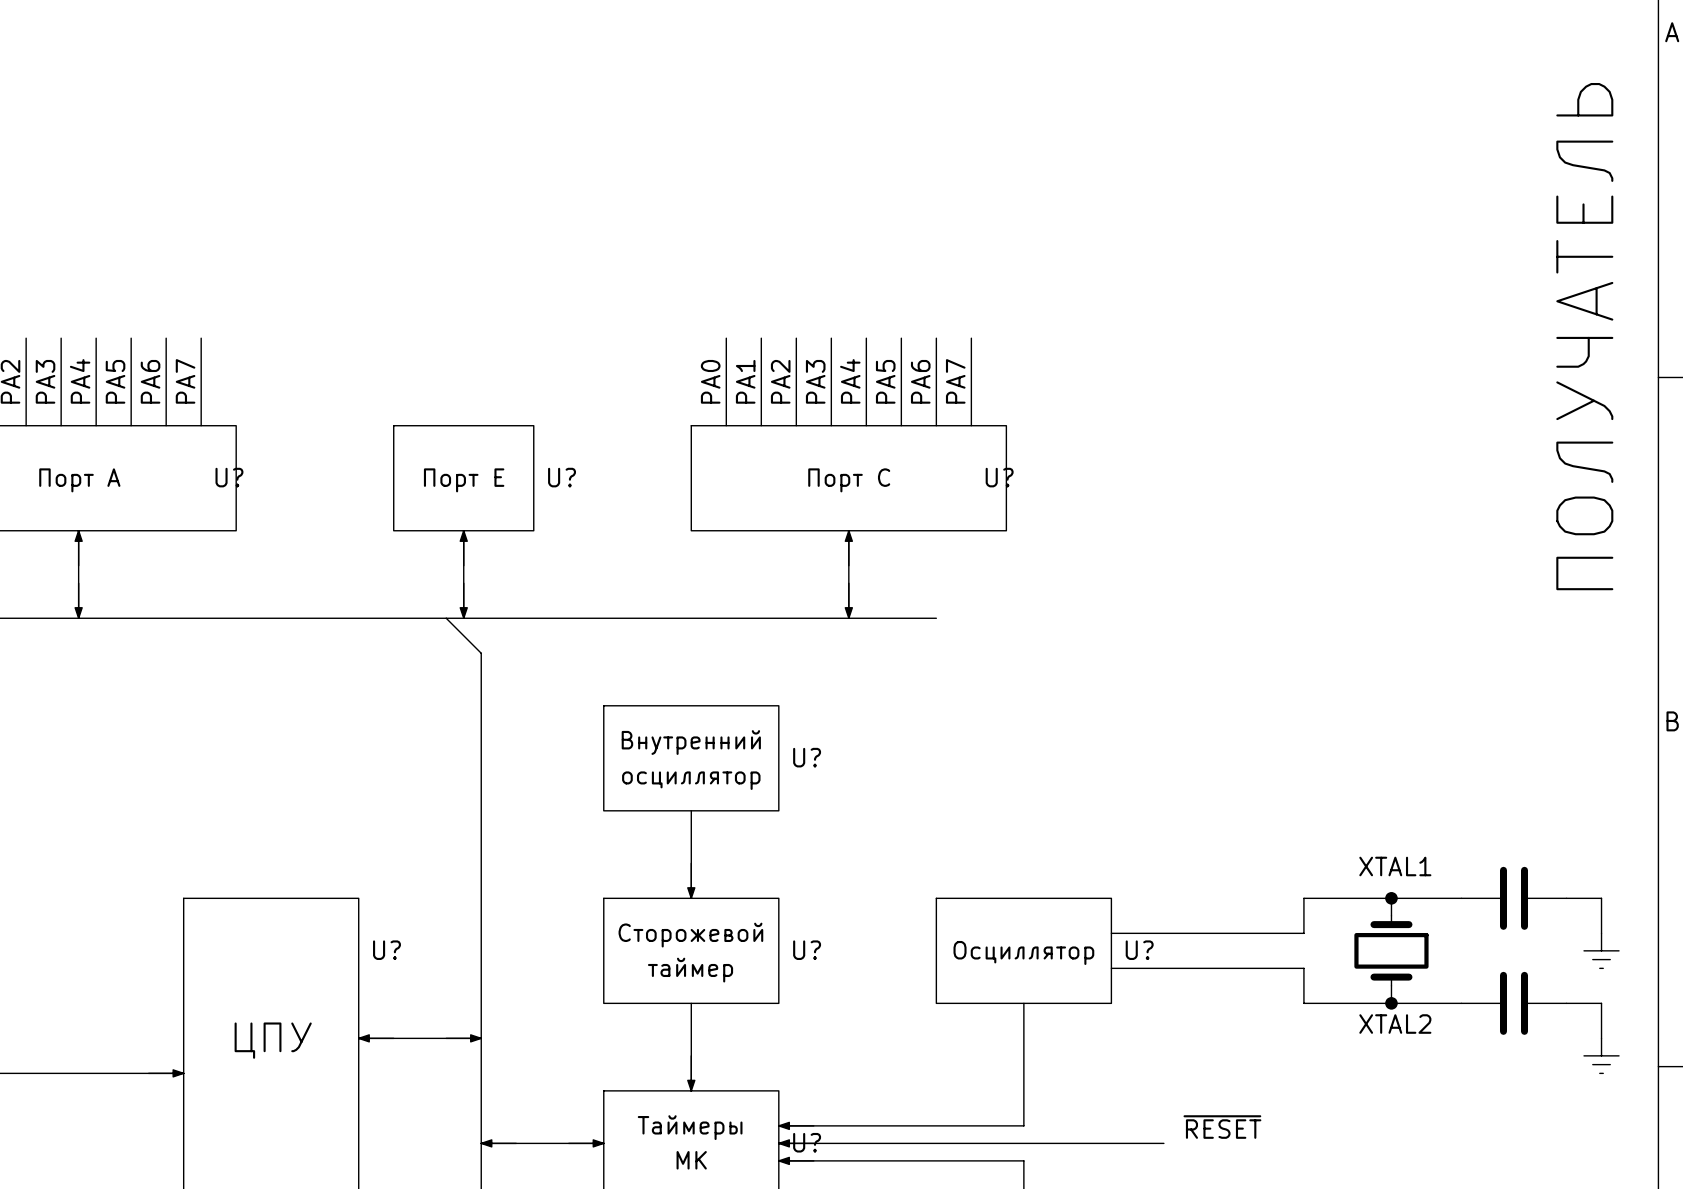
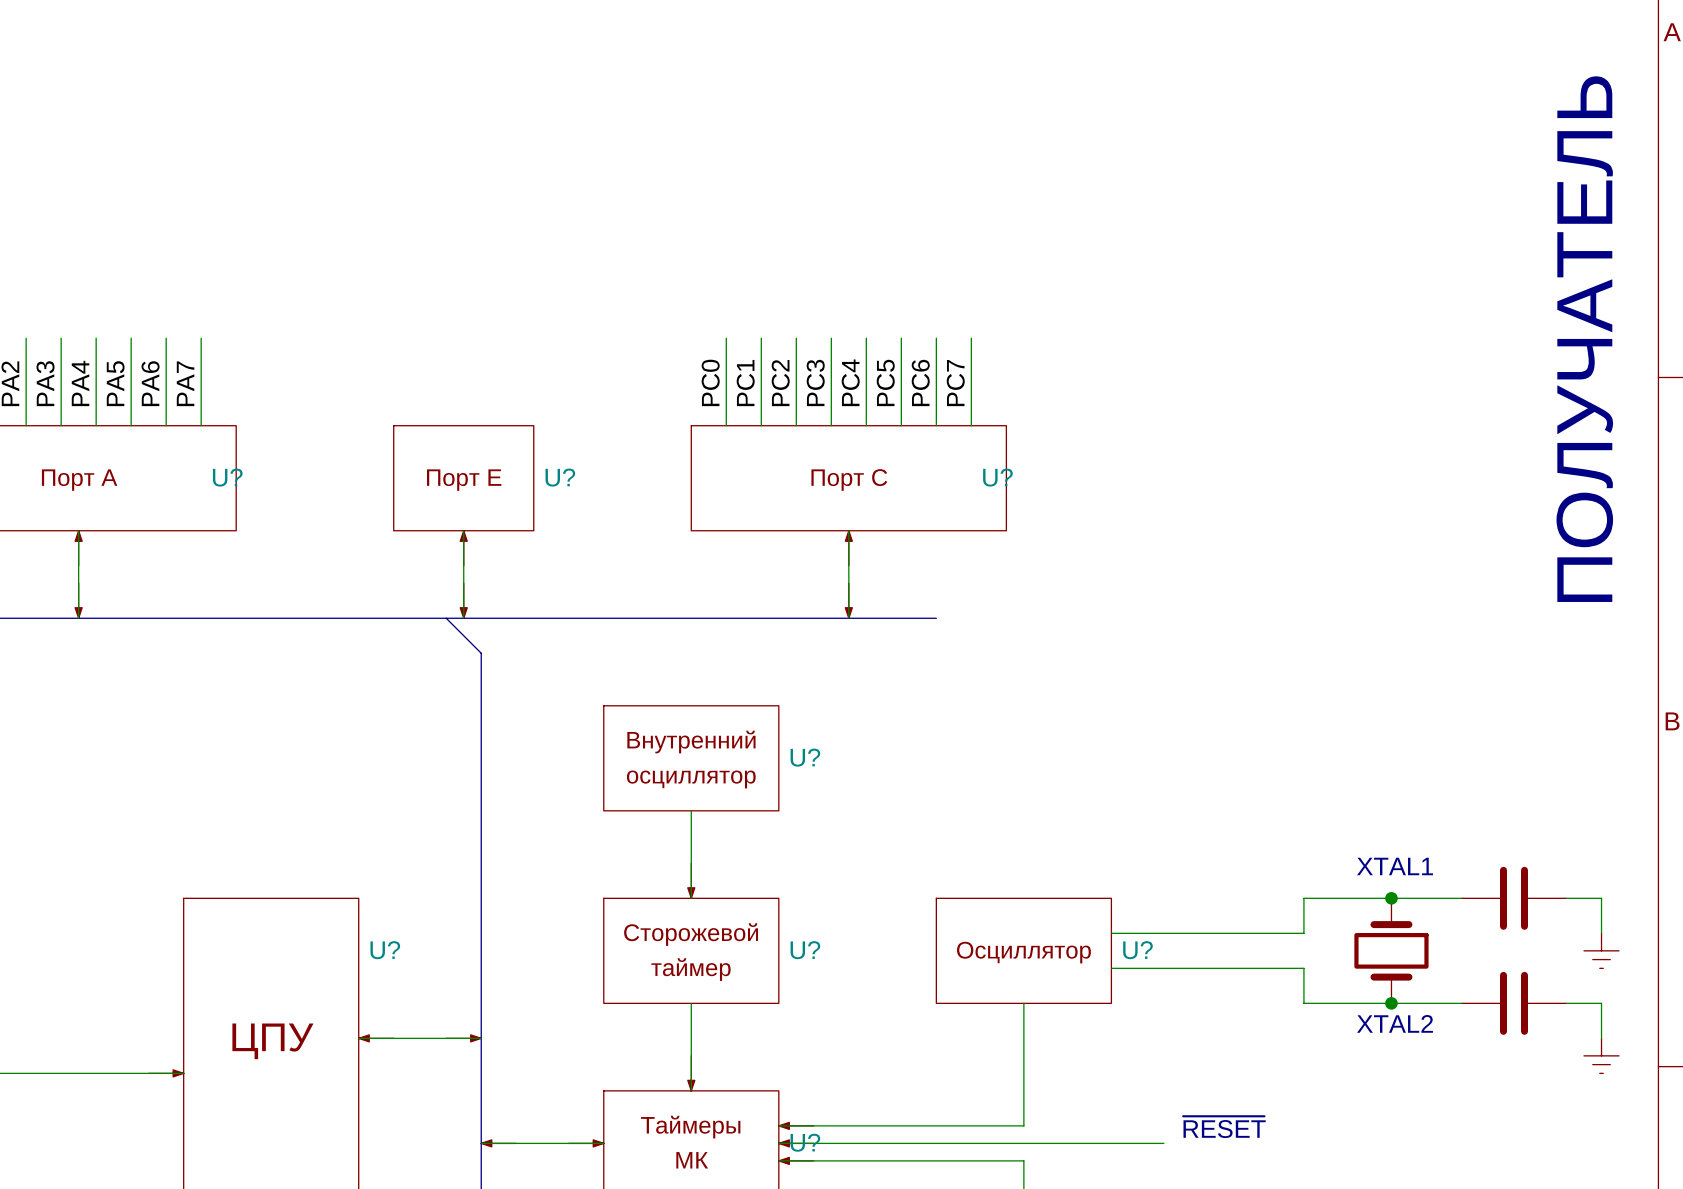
label: PA0 (710, 381) -> PC0 (710, 382)
label: PA1 (745, 381) -> PC1 (745, 383)
label: PA2 (780, 381) -> PC2 (780, 383)
label: PA3 (815, 381) -> PC3 (815, 382)
label: PA4 (850, 381) -> PC4 (850, 382)
label: PA5 (885, 381) -> PC5 (885, 382)
label: PA6 (920, 381) -> PC6 (920, 382)
label: PA7 (955, 381) -> PC7 (955, 383)

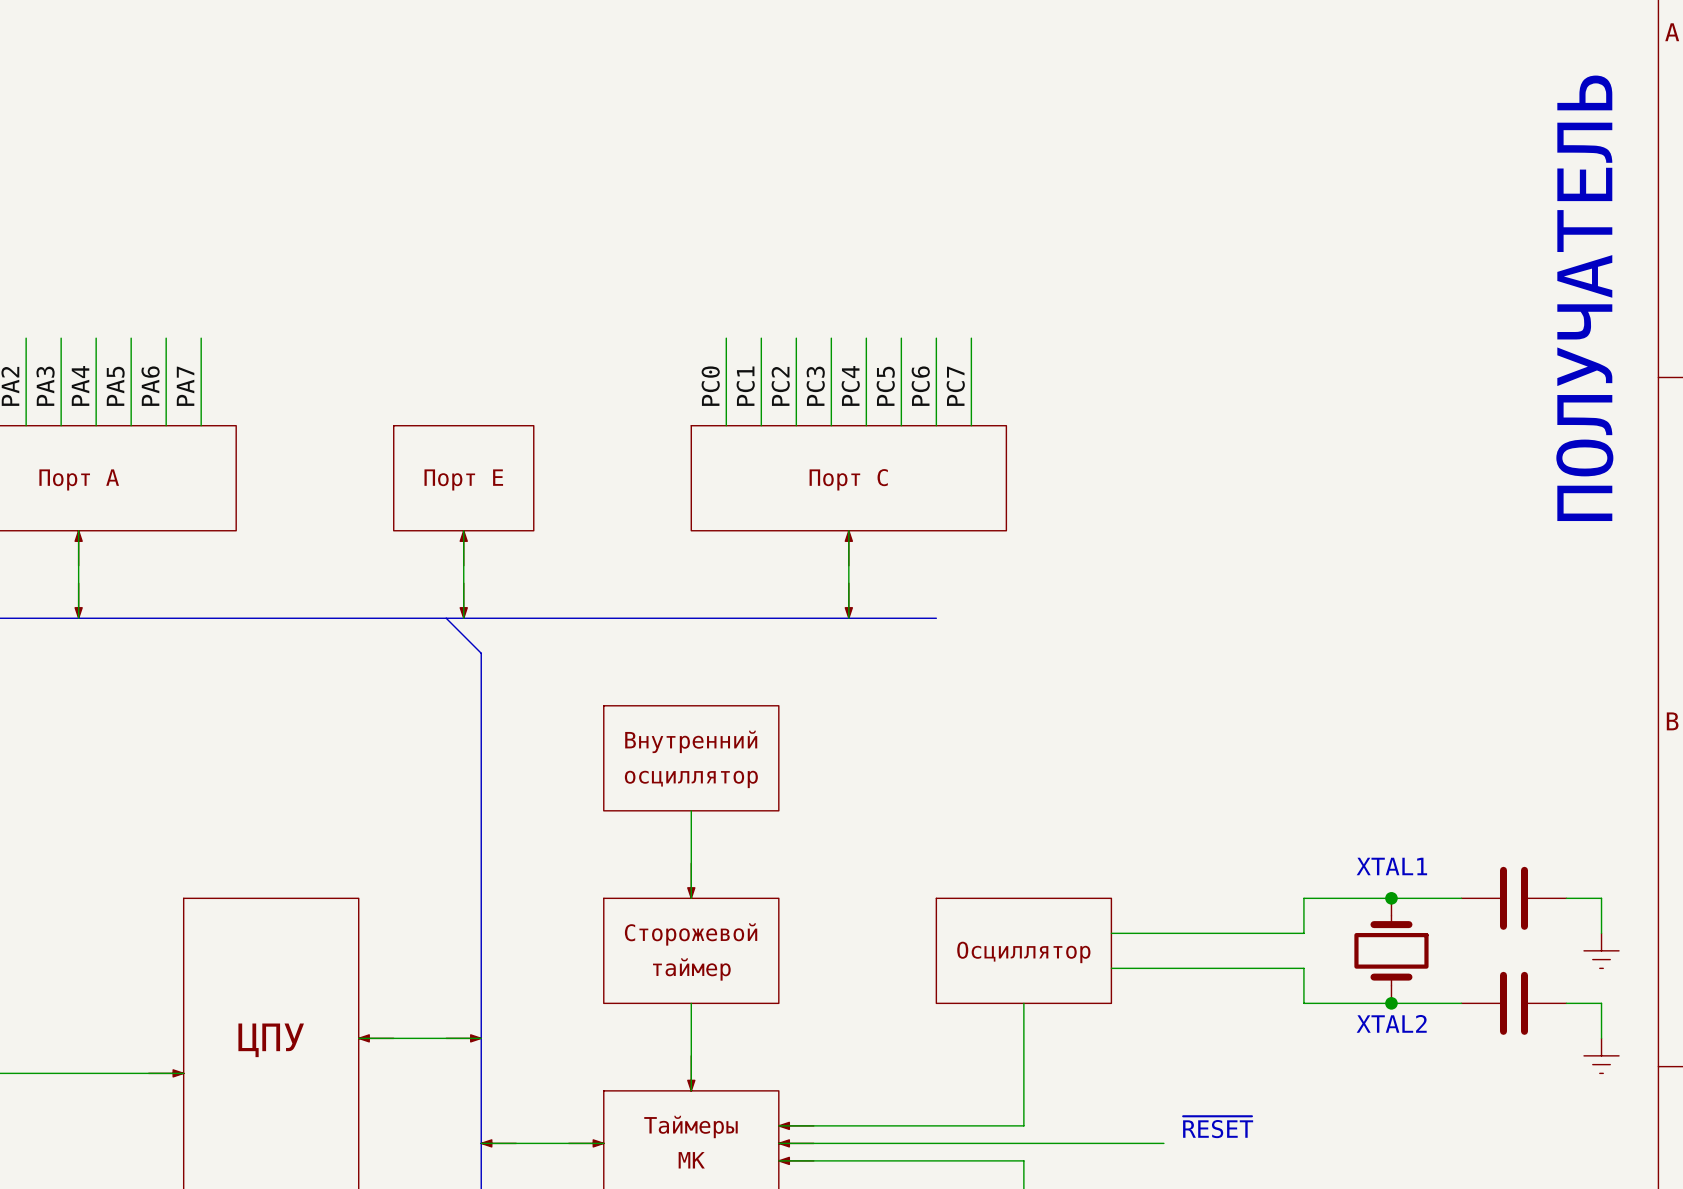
U? name: U? (227, 477) -> none
U? name: U? (560, 477) -> none
U? name: U? (997, 477) -> none
U? name: U? (805, 757) -> none
U? name: U? (385, 950) -> none
U? name: U? (805, 950) -> none
U? name: U? (1137, 950) -> none
U? name: U? (805, 1142) -> none

